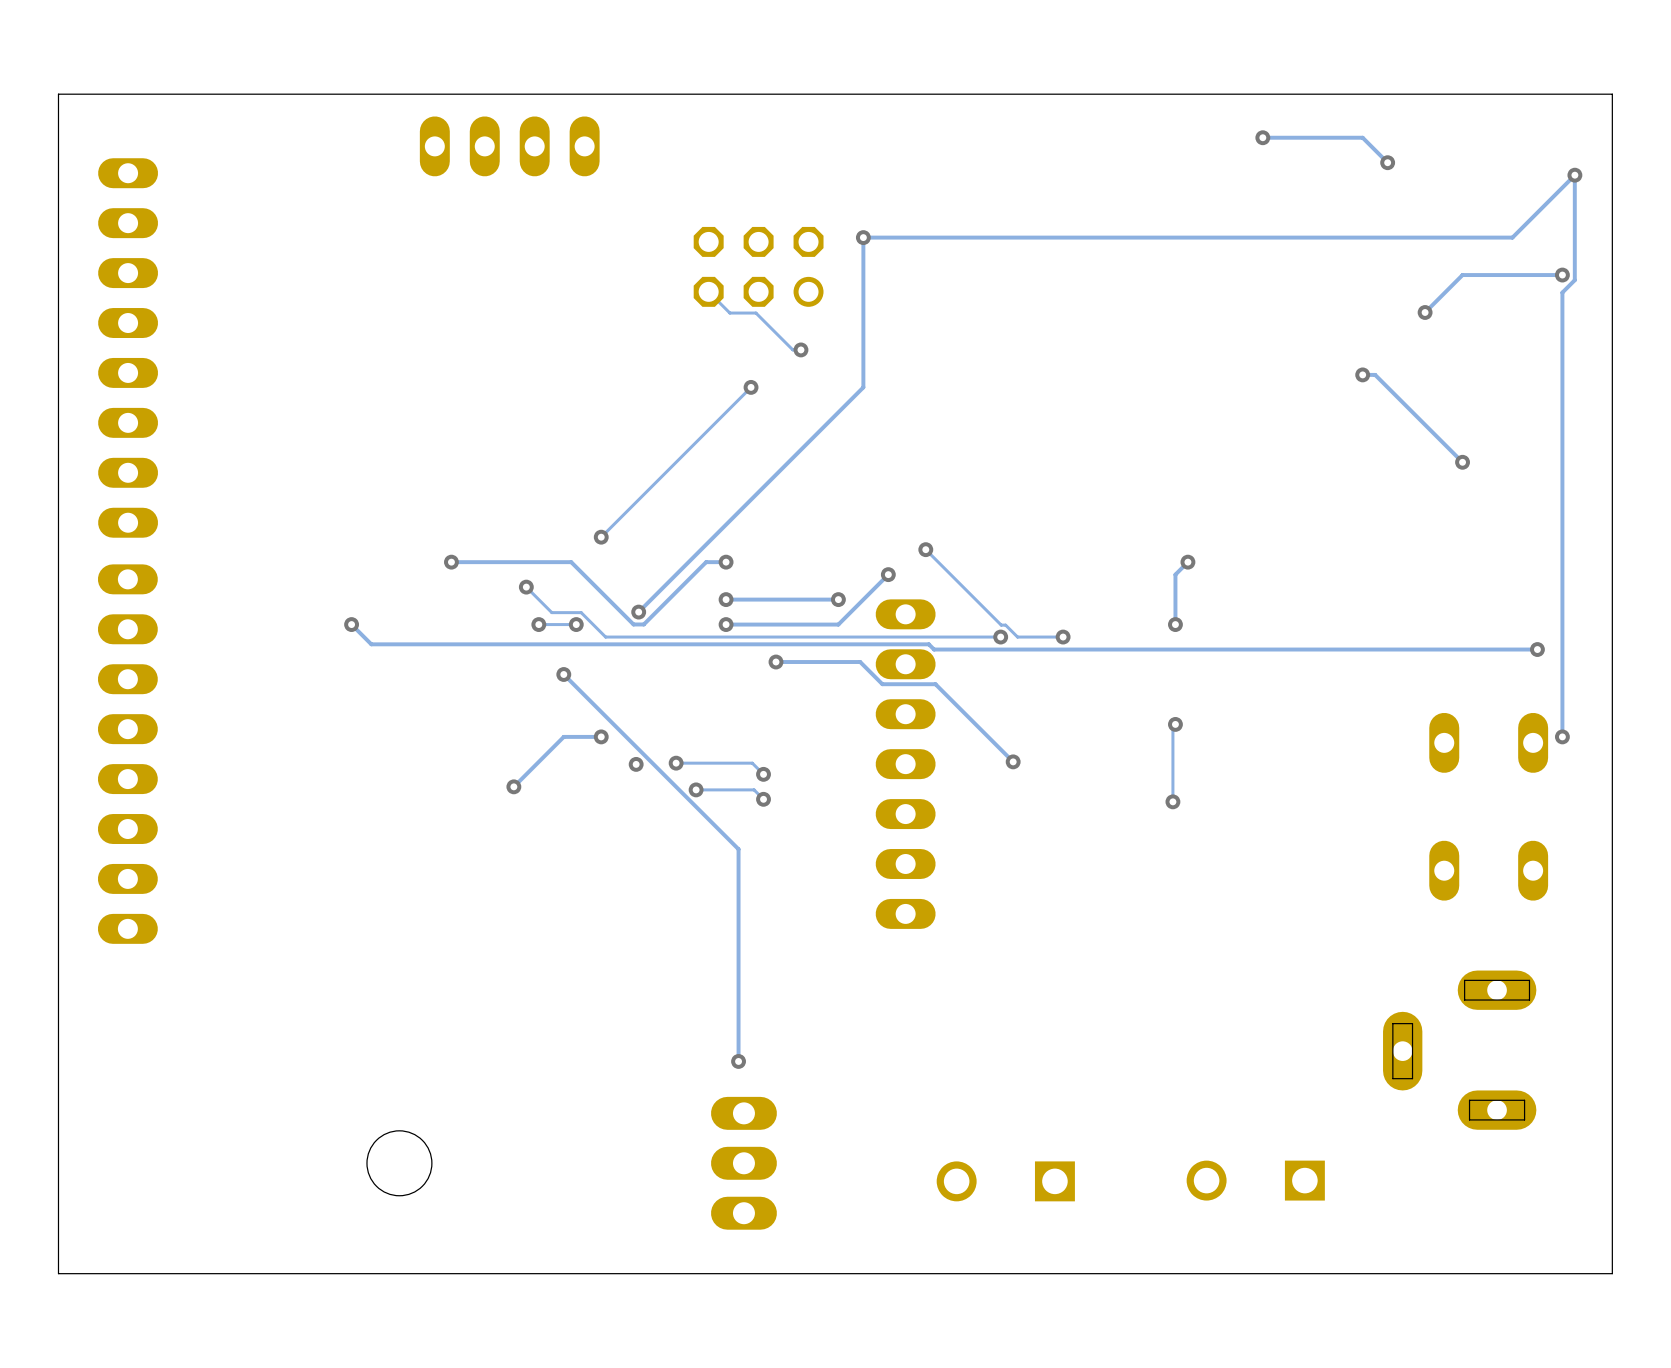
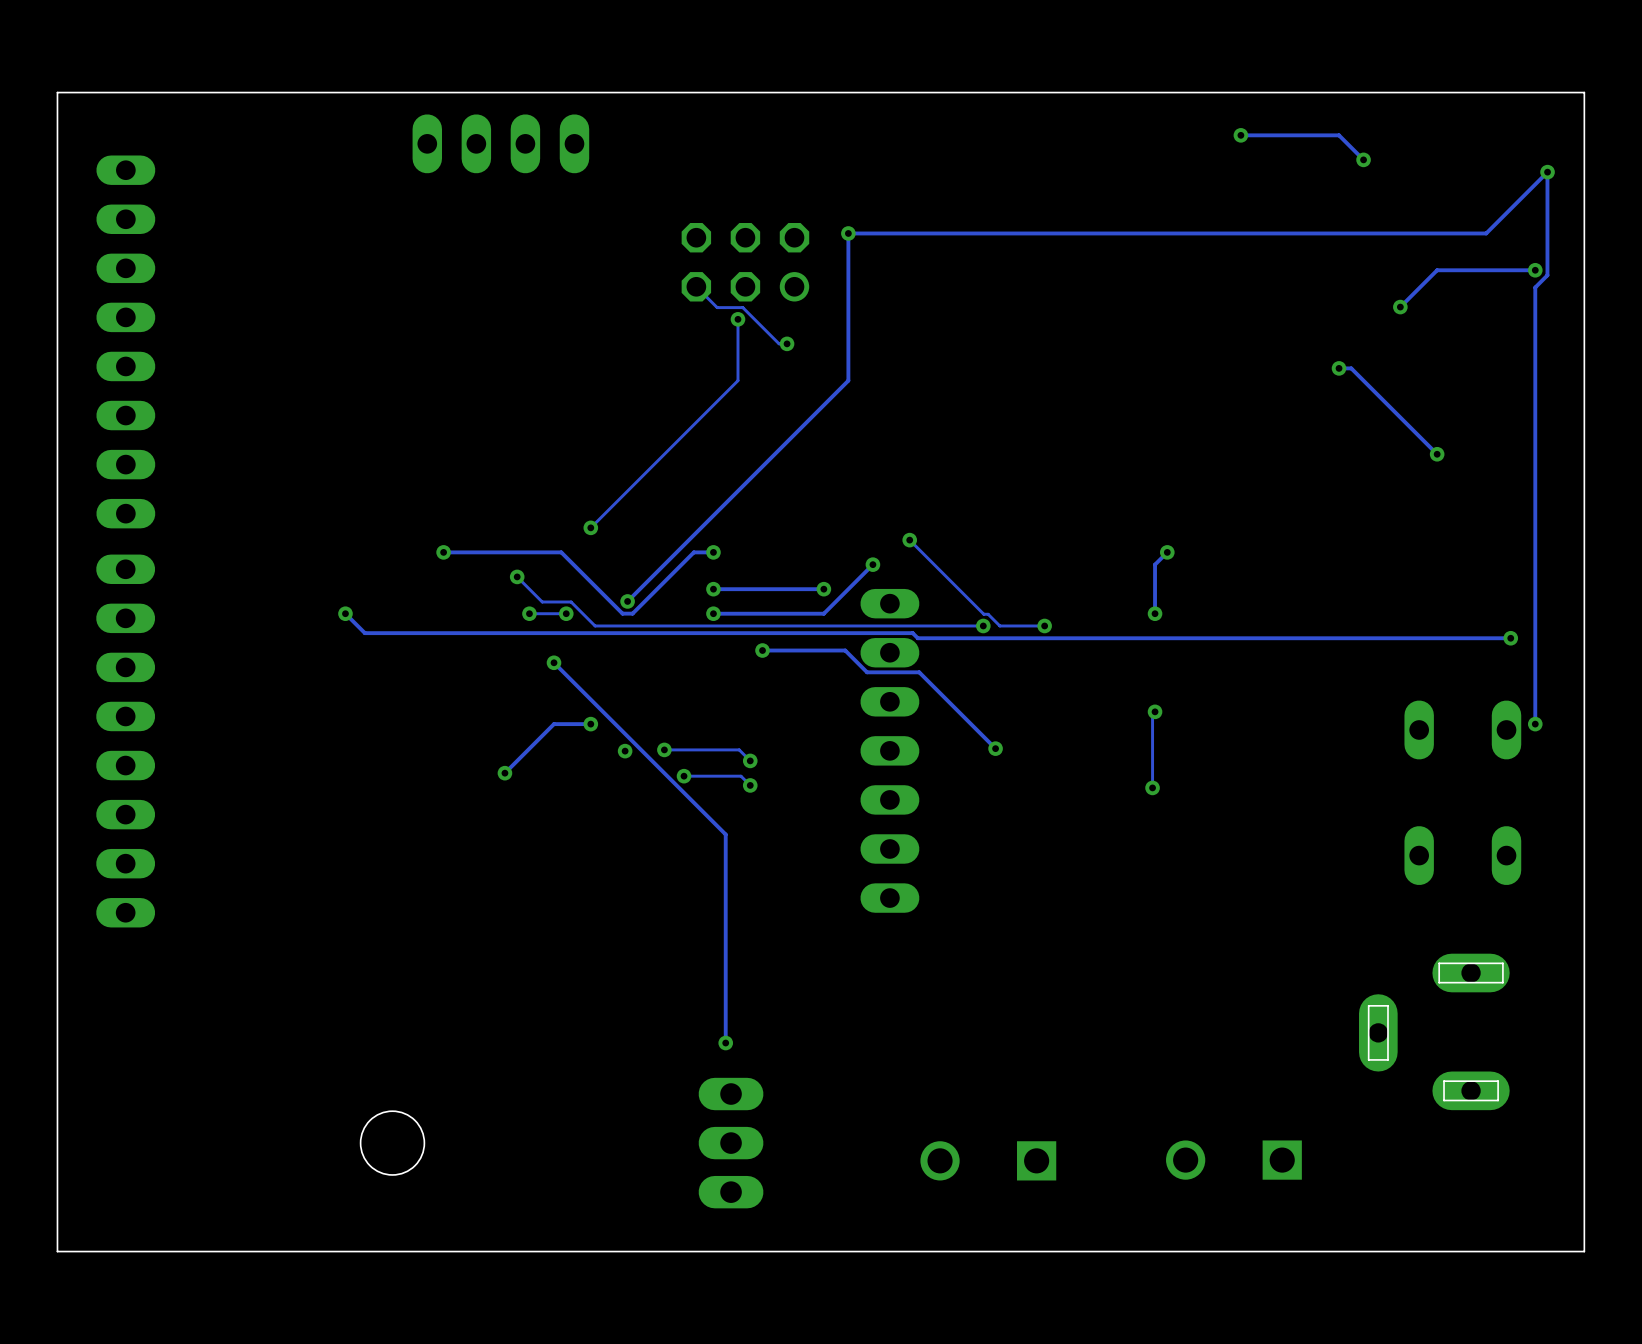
track: none -> (737, 319) (737, 380)
via position: (751, 387) -> (737, 319)

